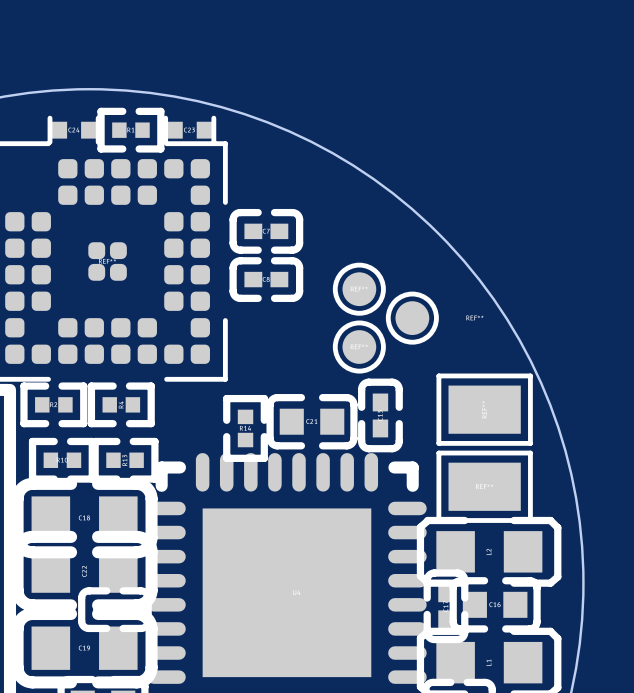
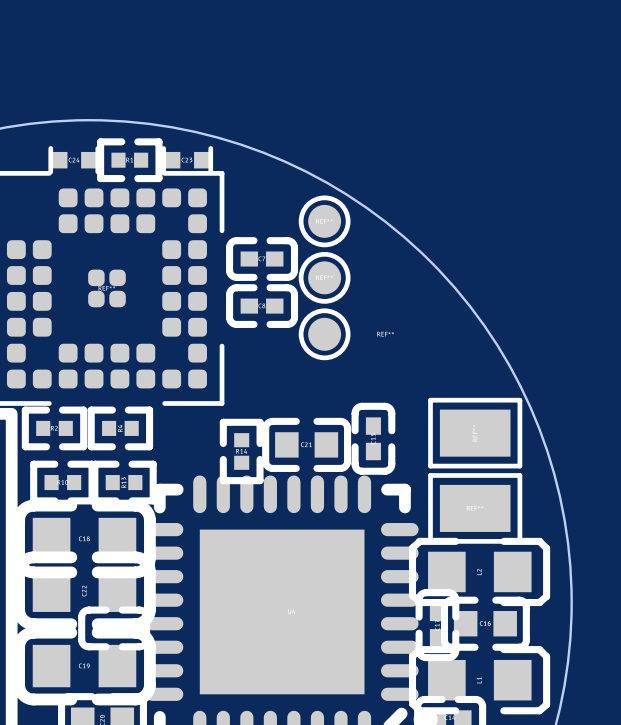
part: none -> (324, 221)
part: none -> (324, 277)
part: (359, 289) -> none
part: none -> (324, 334)
part: (412, 318) -> none
part: (359, 347) -> none

